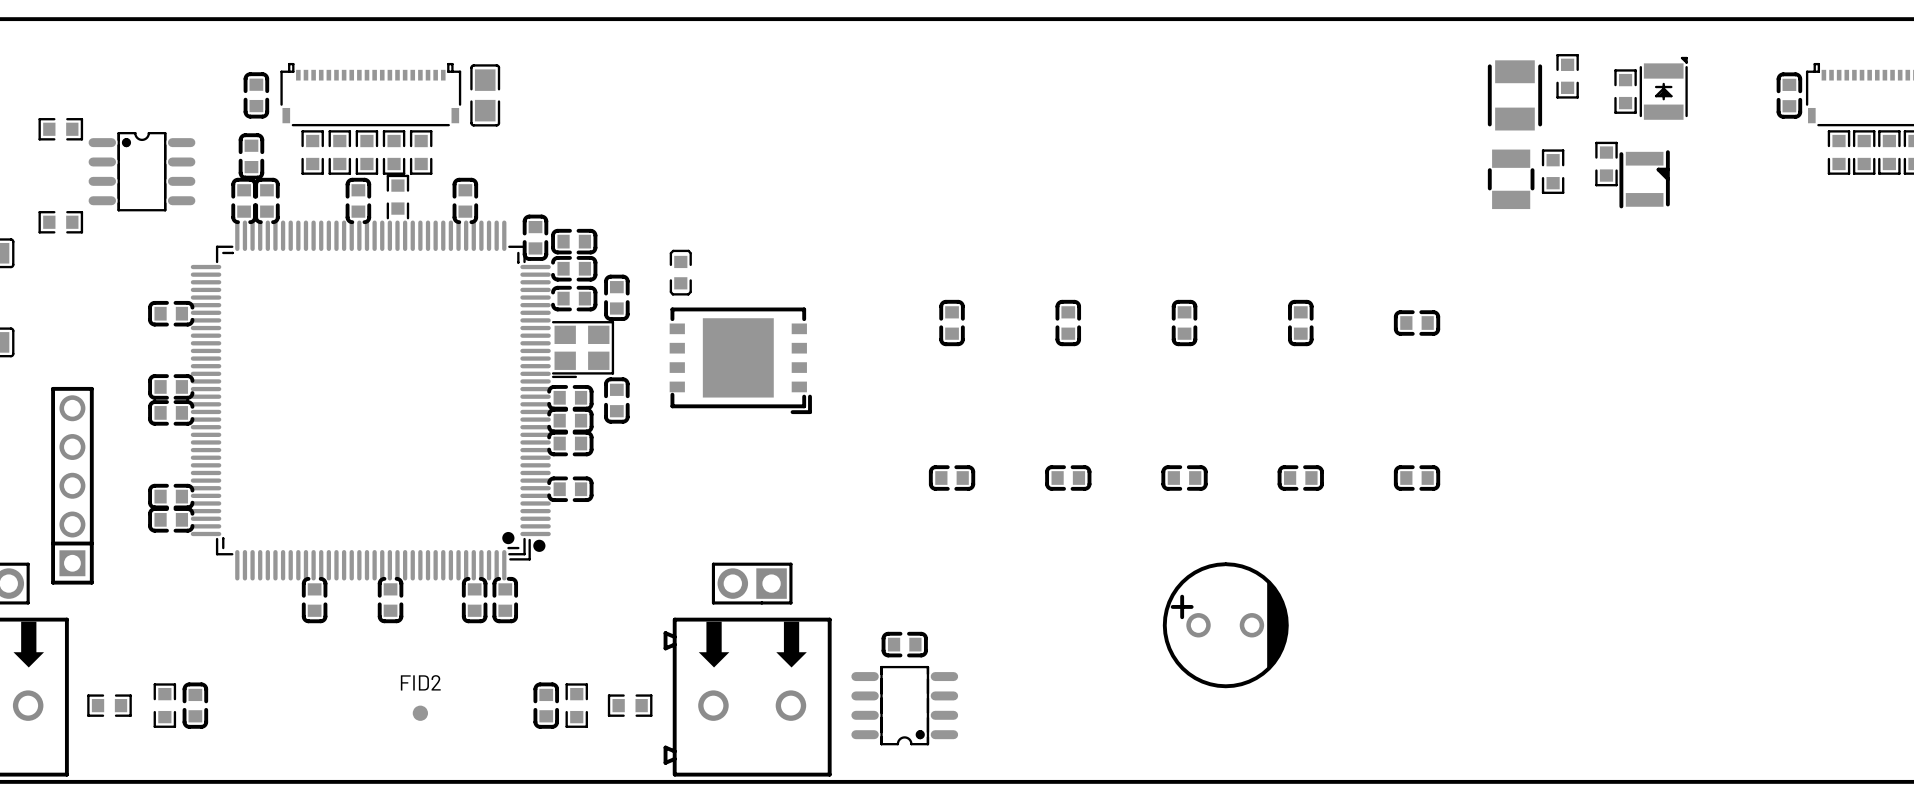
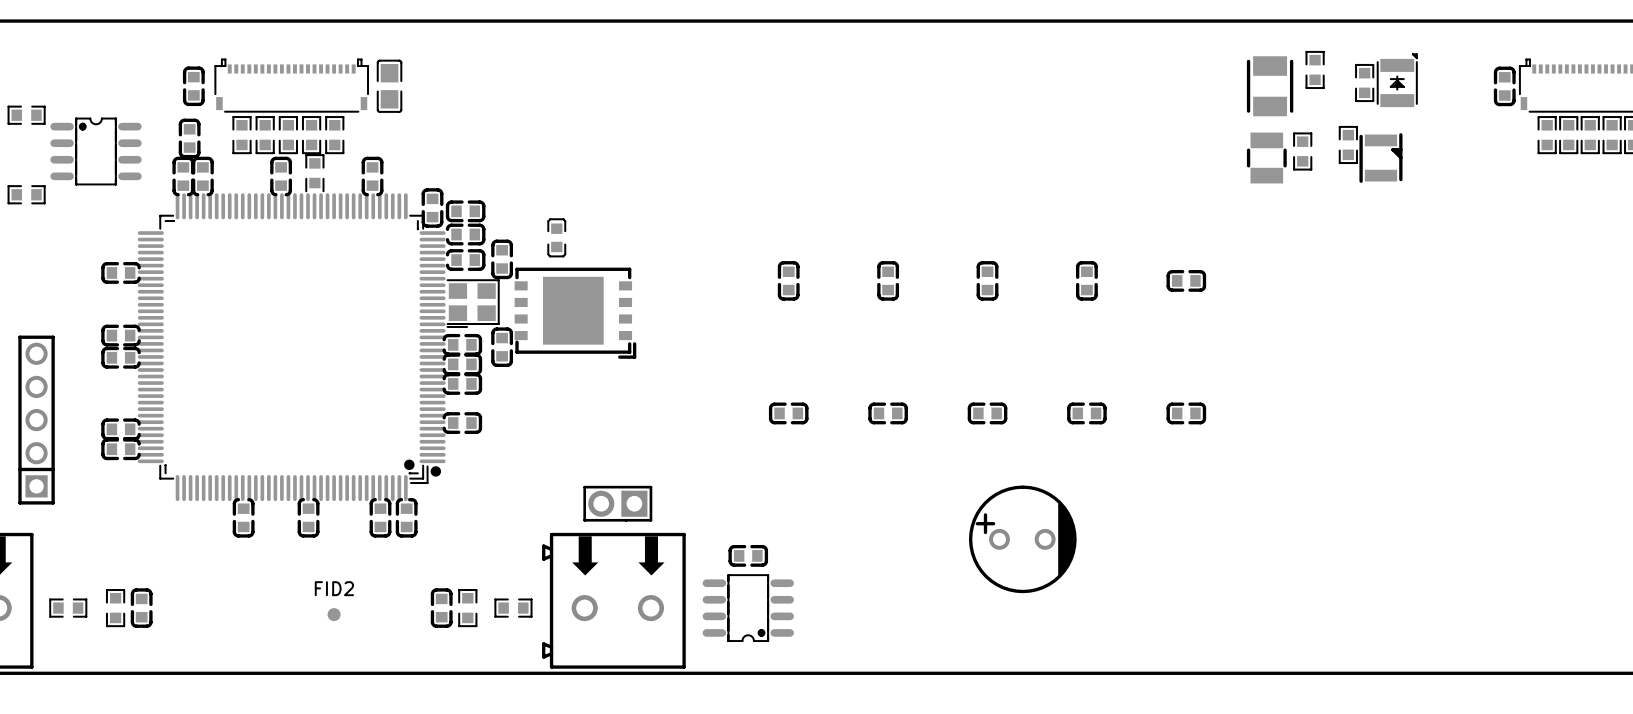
part position: (740, 360) -> (575, 313)

